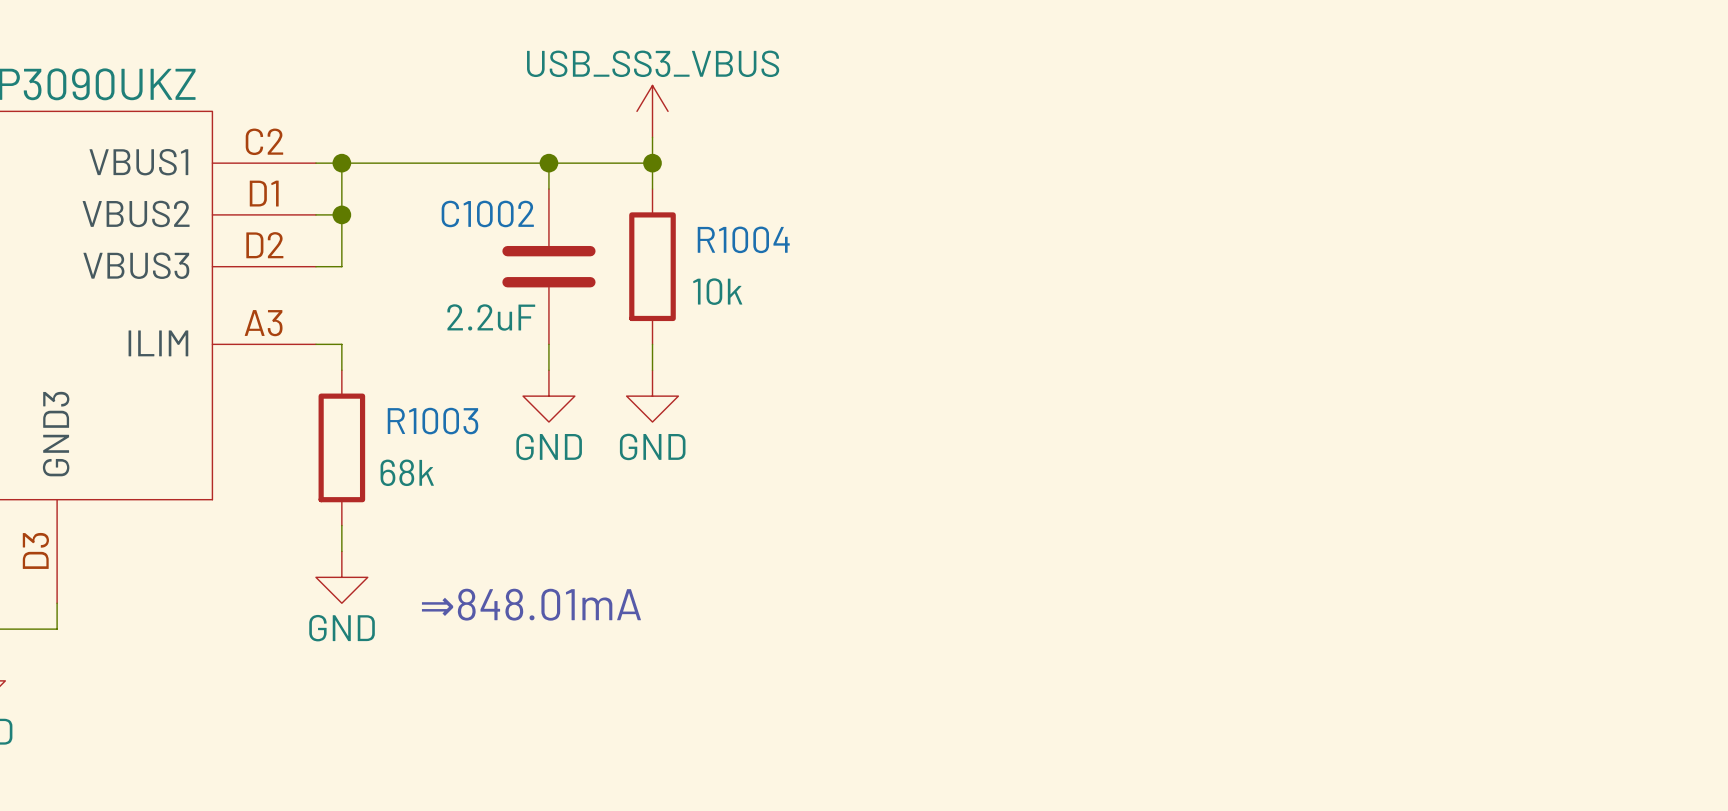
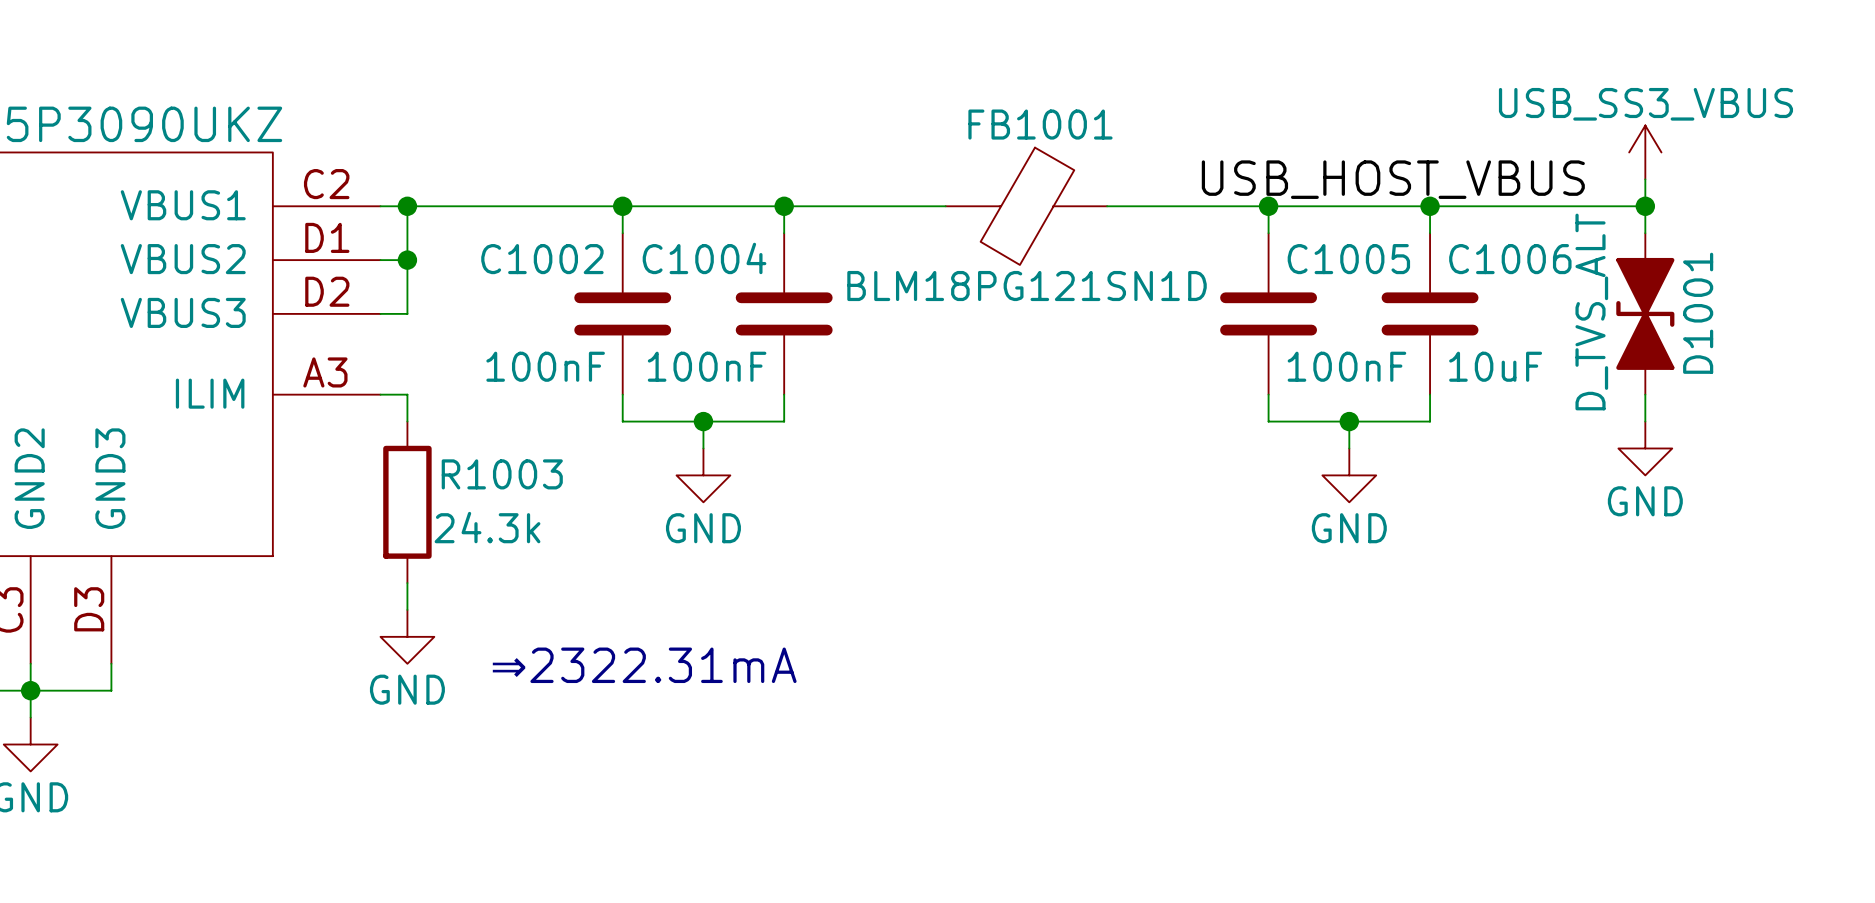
power symbol: USB_SS3_VBUS (652, 111) -> none
power symbol: none -> USB_SS3_VBUS (1645, 152)
label: none -> USB_HOST_VBUS (1393, 179)
wire: (652, 137) (652, 189) -> none
wire: none -> (1645, 179) (1645, 233)
wire: none -> (730, 206) (945, 206)
junction position: (652, 163) -> (784, 206)
wire: none -> (784, 206) (784, 233)
FB1001: none -> BLM18PG121SN1D (1026, 206)
wire: none -> (1107, 206) (1645, 206)
wire: none -> (1268, 206) (1268, 233)
junction: none -> (1268, 206)
wire: none -> (1430, 206) (1430, 233)
junction: none -> (1430, 206)
junction: none -> (1645, 206)
R1004: 10k (652, 266) -> none
C1004: none -> 100nF (784, 313)
C1005: none -> 100nF (1268, 313)
C1006: none -> 10uF (1430, 313)
D1001: none -> D_TVS_ALT (1645, 313)
C1002 value: 2.2uF (491, 317) -> 100nF (545, 366)
wire: (652, 344) (652, 370) -> (703, 421) (703, 448)
wire: none -> (784, 394) (784, 421) (622, 421)
wire: none -> (1268, 394) (1268, 421) (1430, 421) (1430, 394)
wire: none -> (1645, 394) (1645, 421)
junction: none -> (703, 421)
wire: none -> (1349, 421) (1349, 448)
junction: none -> (1349, 421)
power symbol: GND (548, 396) -> none
power symbol position: GND (652, 396) -> GND (703, 475)
power symbol: none -> GND (1645, 448)
power symbol: none -> GND (1349, 475)
R1003 value: 68k (407, 472) -> 24.3k (487, 527)
text: ⇒848.01mA (531, 604) -> ⇒2322.31mA (643, 665)

